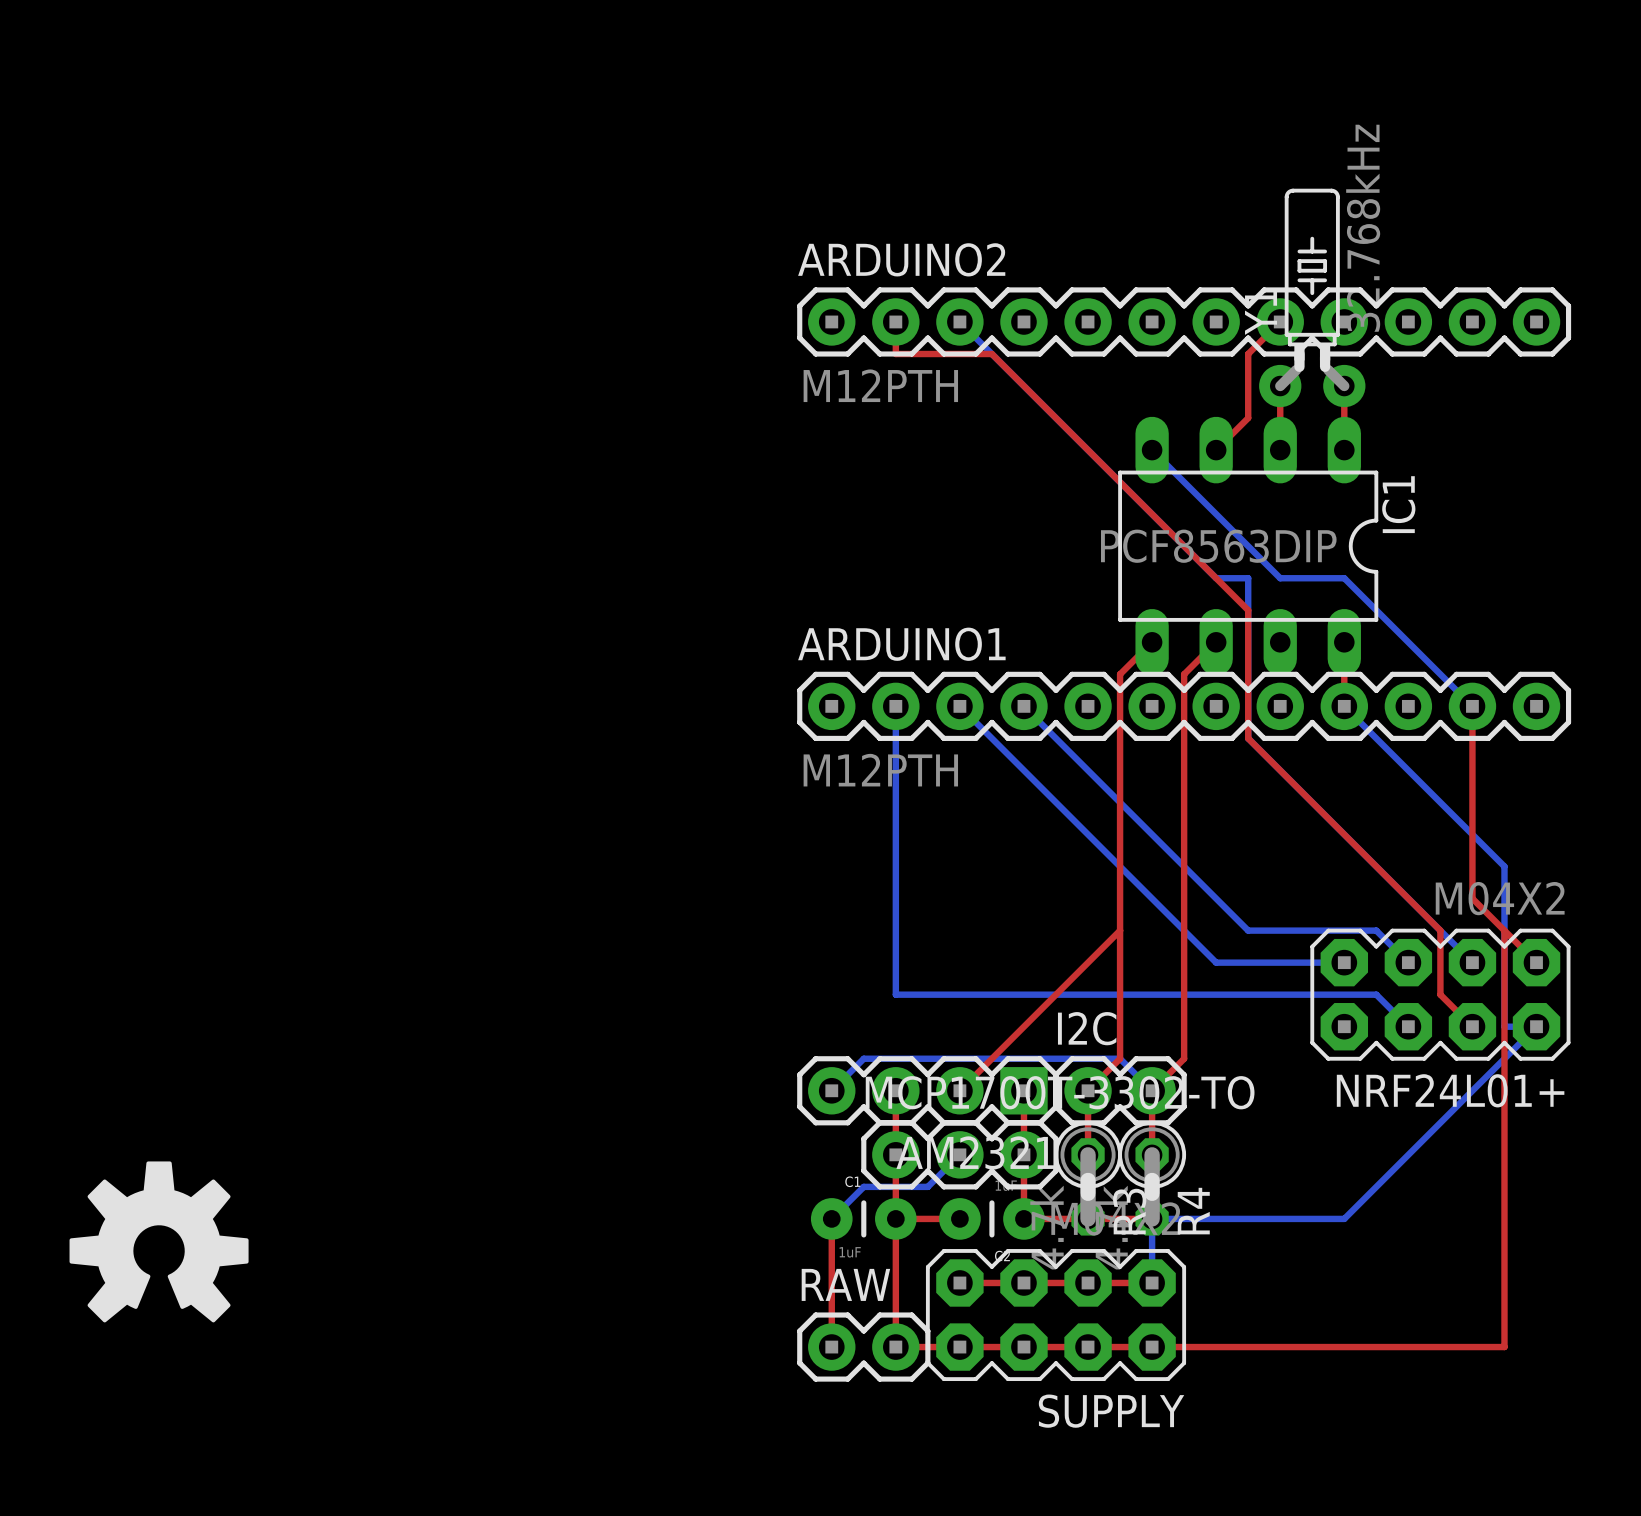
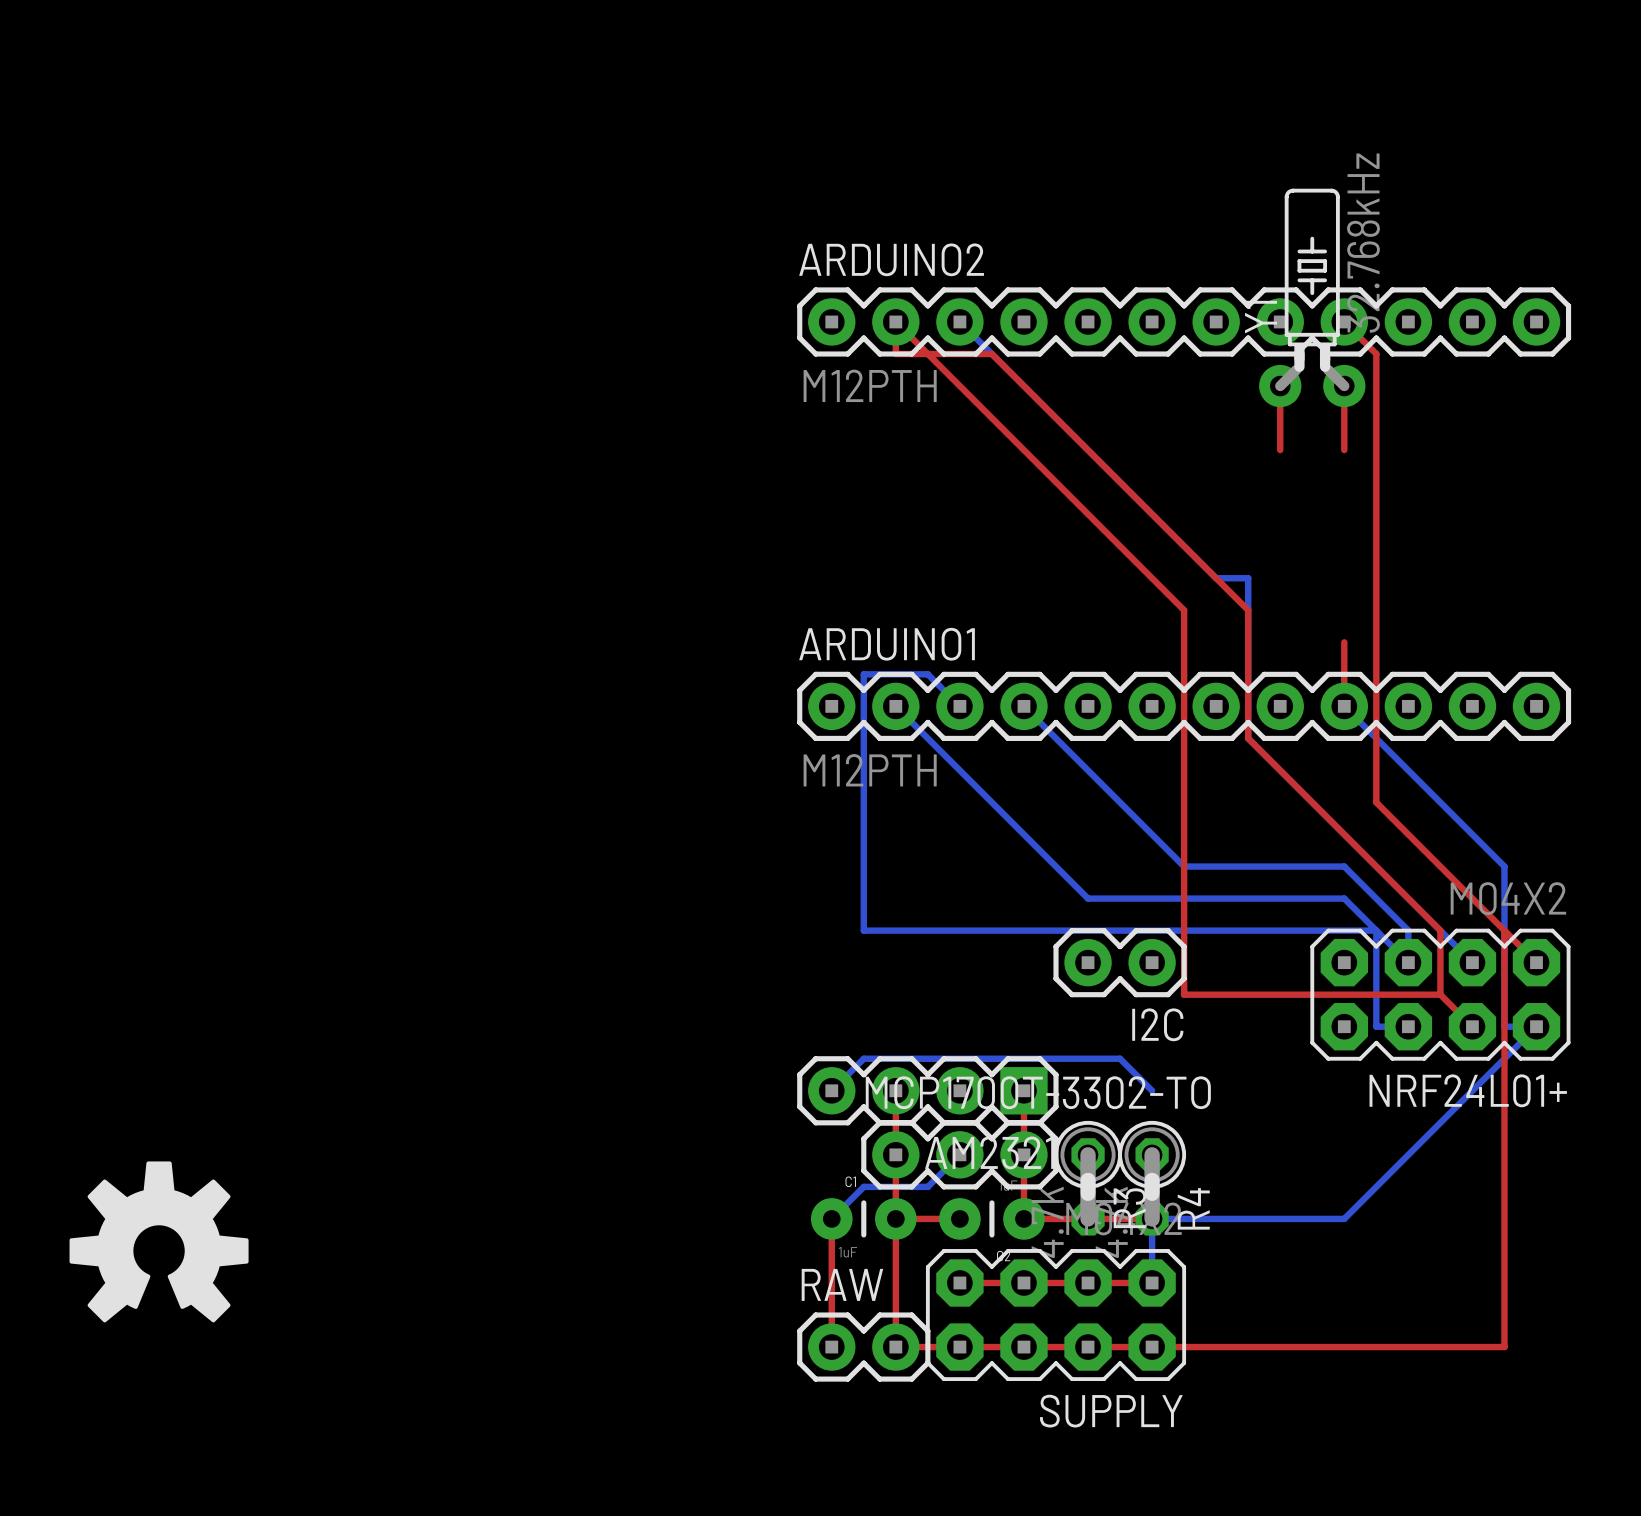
top track: (1280, 321) (1248, 354) (1248, 418) (1216, 450) -> none
bottom track: (1152, 450) (1280, 578) (1344, 578) (1472, 706) -> none
IC1: PCF8563DIP (1248, 546) -> none
top track: (1152, 642) (1120, 674) (1120, 1058) (1088, 1090) (1088, 1154) -> none
top track: (1216, 642) (1184, 674) -> (895, 321) (1184, 610) (1184, 674)
bottom track: (895, 706) (895, 994) (1376, 994) (1408, 1026) -> (895, 706) (1088, 898) (1344, 898) (1376, 930) (1376, 1026) (1408, 1026)
bottom track: (959, 706) (1216, 962) (1344, 962) -> (959, 706) (927, 674) (863, 674) (863, 930) (1248, 930)
top track: (1472, 706) (1472, 898) -> (1344, 321) (1376, 354) (1376, 802) (1472, 898)
bottom track: (1184, 866) (1248, 930) -> (1184, 866) (1344, 866) (1408, 930) (1408, 962)
top track: (1120, 930) (959, 1090) -> none
top track: (1184, 994) (1184, 1058) (1152, 1090) (1152, 1154) -> (1184, 994) (1440, 994)
I2C name position: I2C (1087, 1028) -> I2C (1157, 1024)
I2C position: (1120, 1090) -> (1120, 962)

